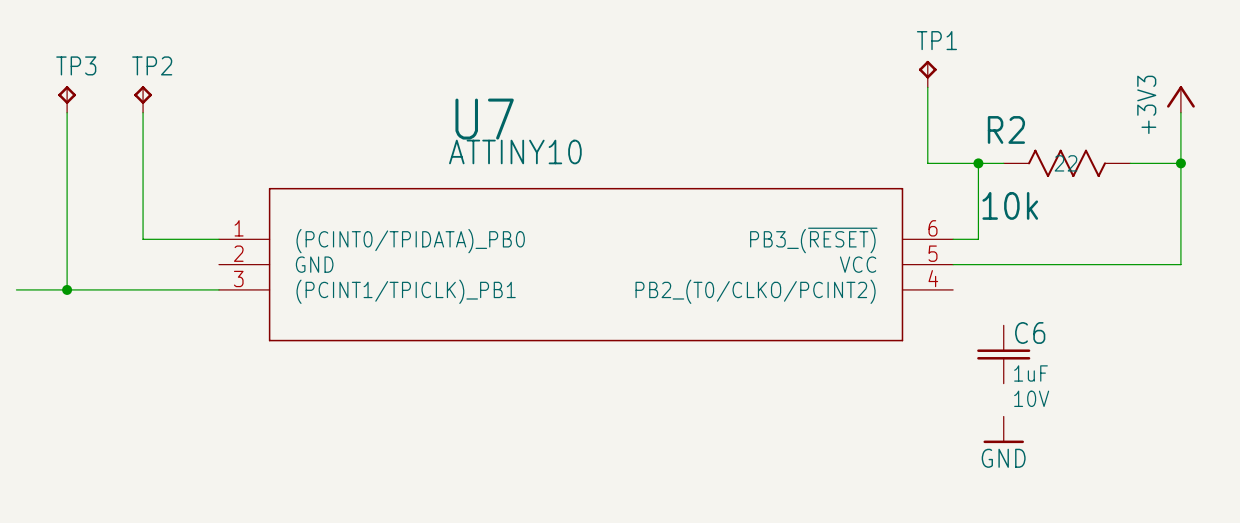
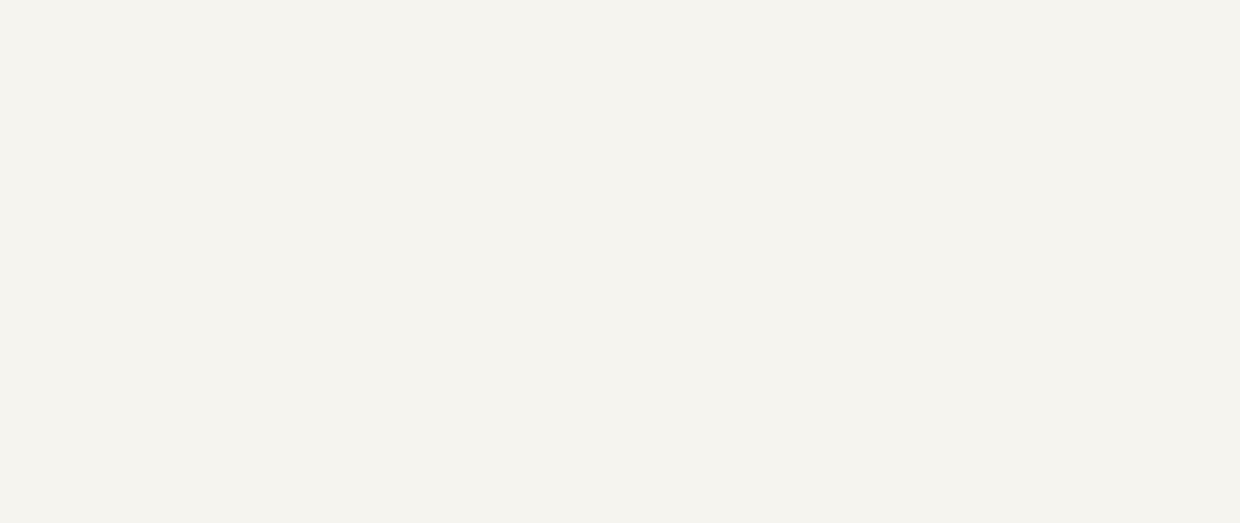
TP1: (927, 74) -> none
wire: (927, 87) (927, 163) (1003, 163) -> none
TP3: (67, 99) -> none
TP2: (143, 99) -> none
power symbol: +3V3 (1180, 99) -> none
wire: (67, 112) (67, 289) -> none
wire: (143, 112) (143, 239) (218, 239) -> none
wire: (1180, 112) (1180, 264) (953, 264) -> none
wire: (978, 163) (978, 239) (953, 239) -> none
junction: (978, 163) -> none
R2: 10k (1067, 163) -> none
wire: (1130, 163) (1180, 163) -> none
junction: (1180, 163) -> none
U7: (586, 264) -> none
wire: (16, 289) (218, 289) -> none
junction: (67, 289) -> none
C6: 1uF (1003, 354) -> none
power symbol: GND (1003, 429) -> none

